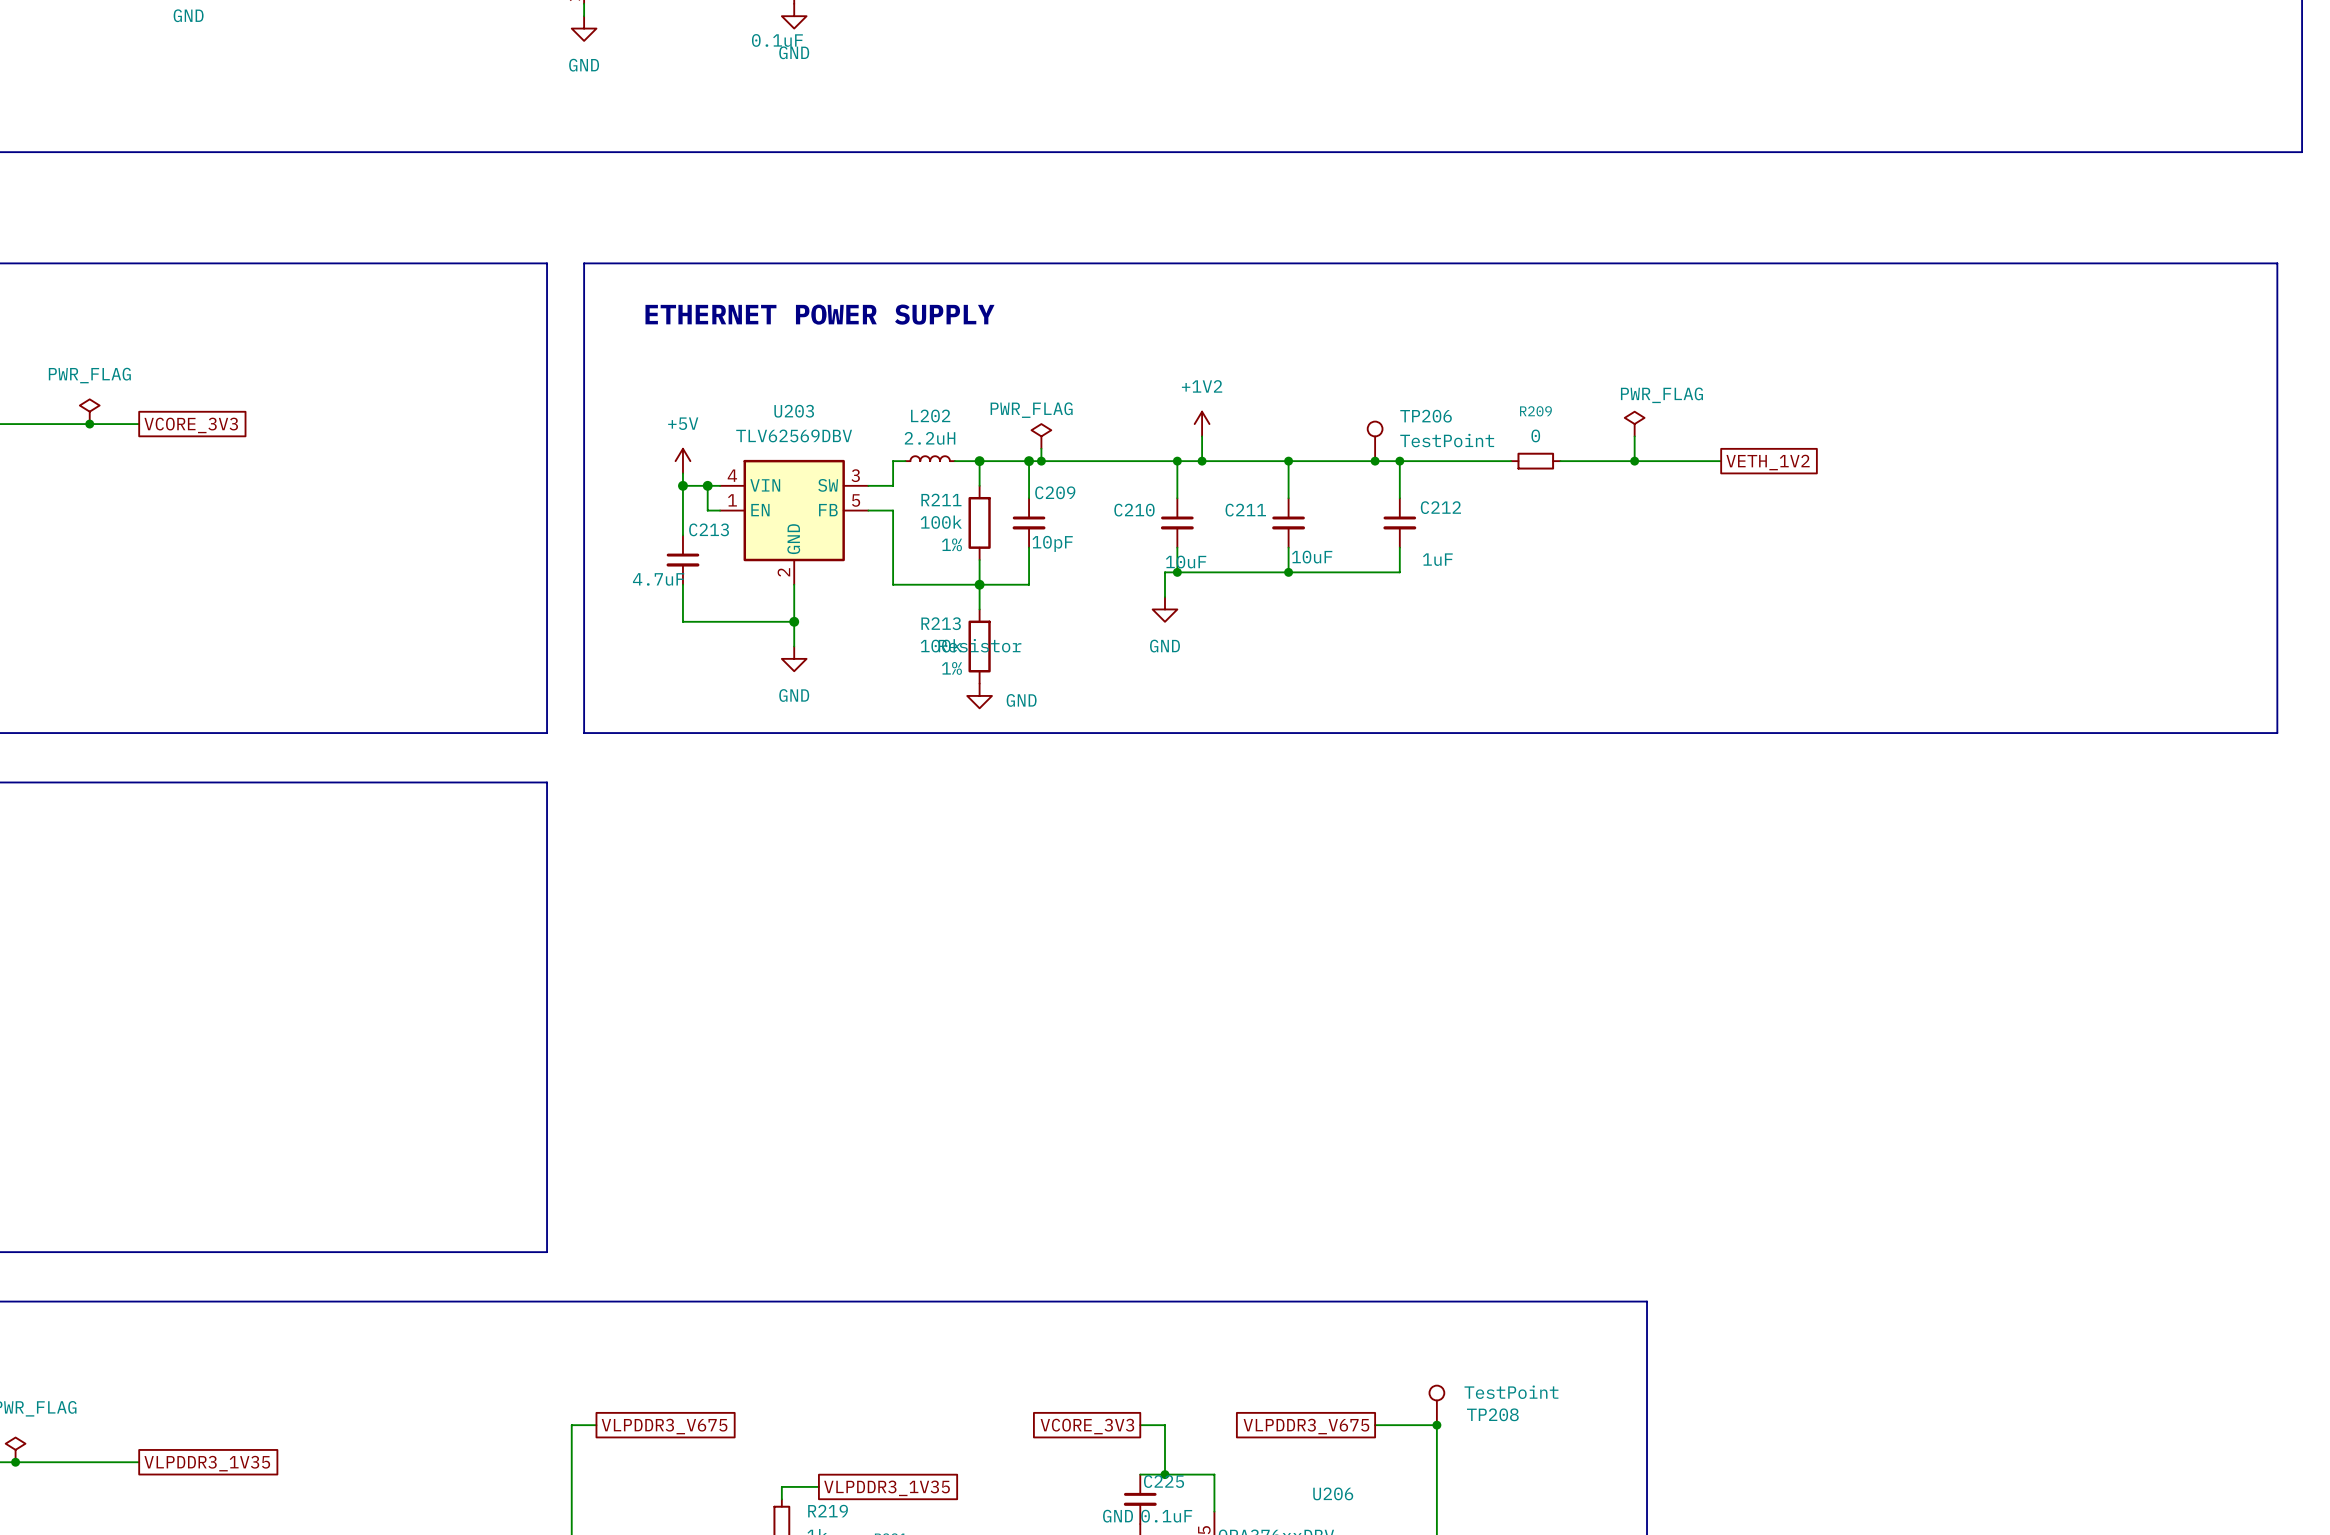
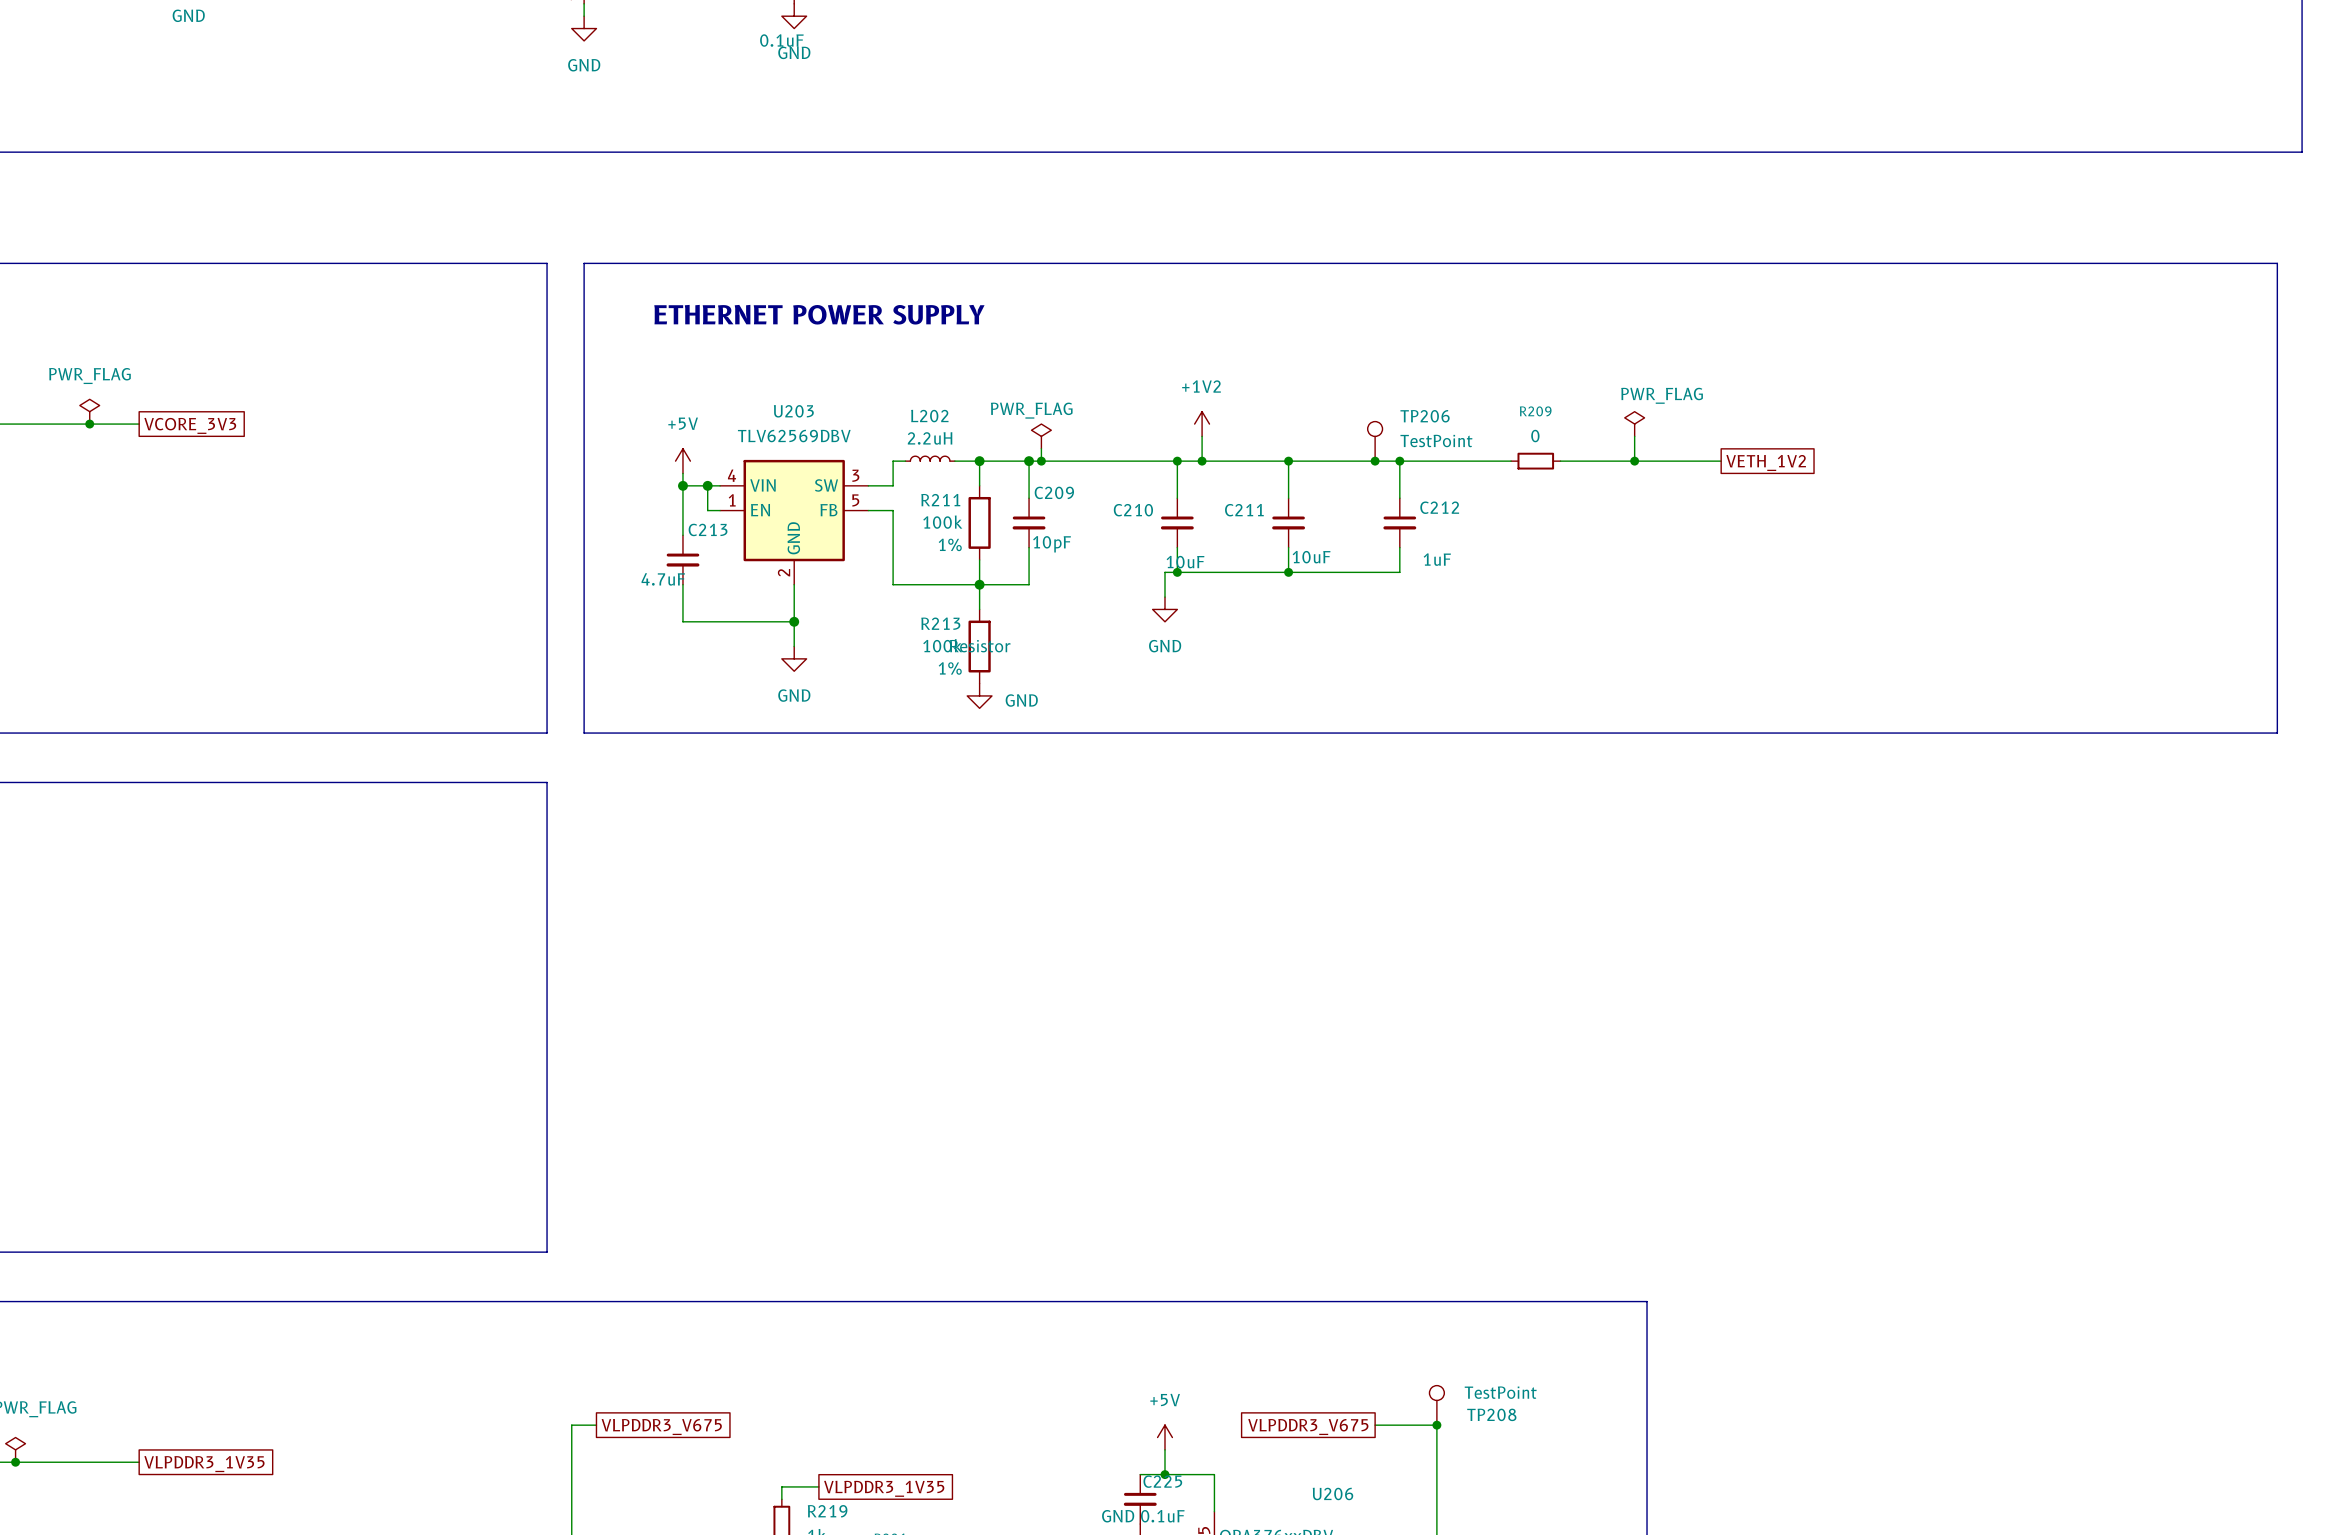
wire: (1140, 1425) (1164, 1425) (1164, 1449) -> none
global label: VCORE_3V3 (1087, 1426) -> none
power symbol: none -> +5V (1164, 1437)

